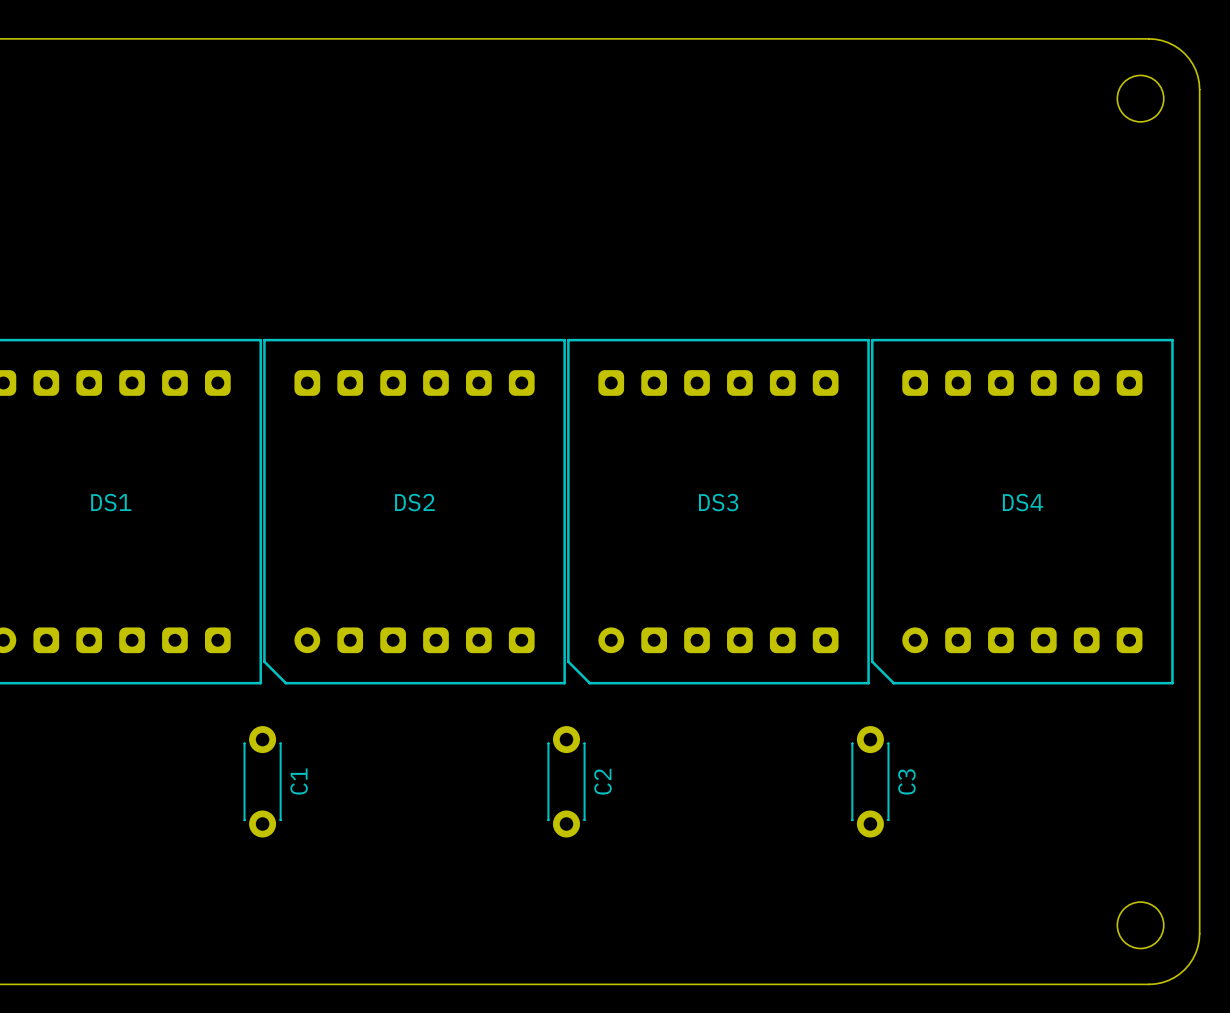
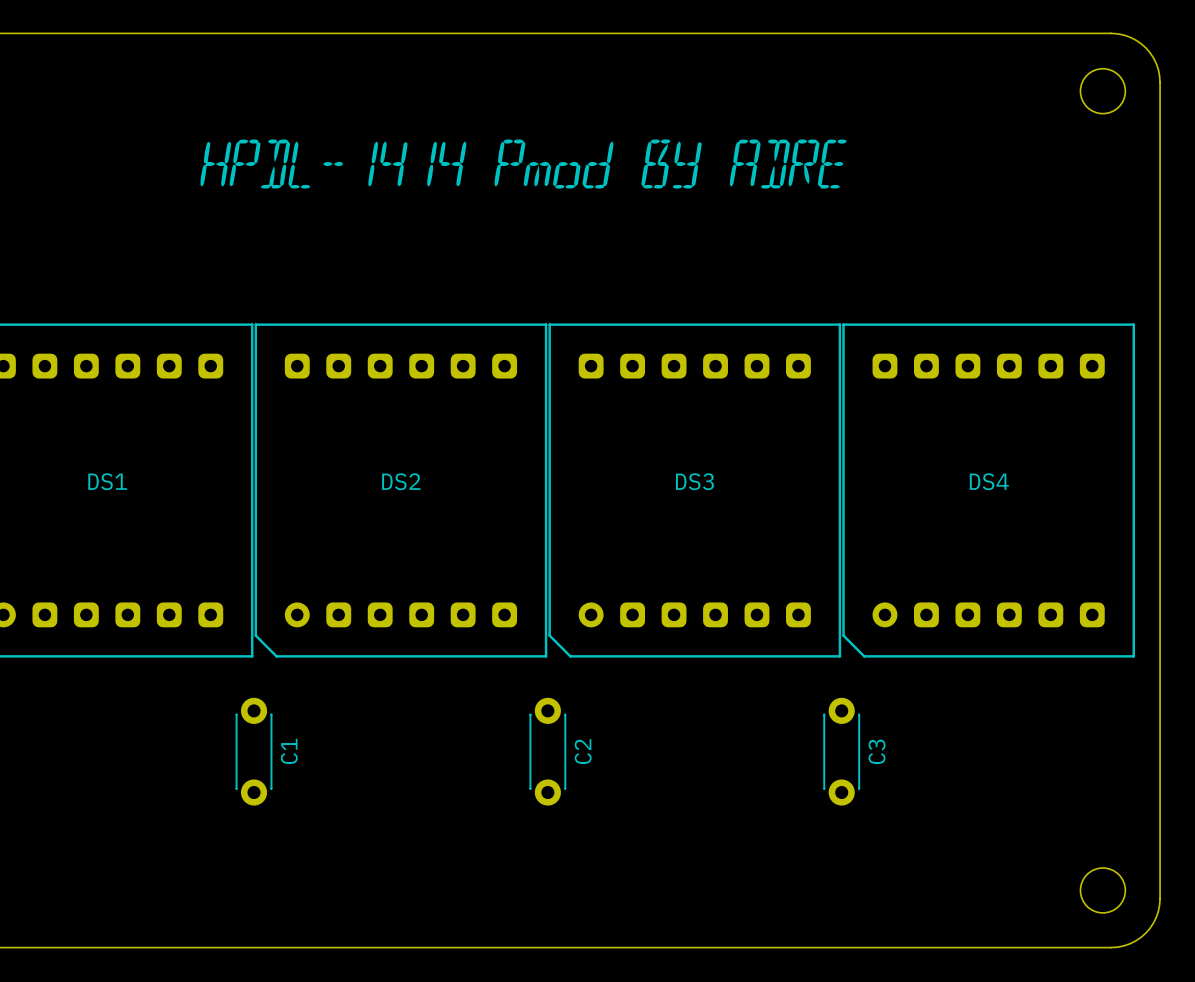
drawing: none -> [200, 139, 847, 189]

